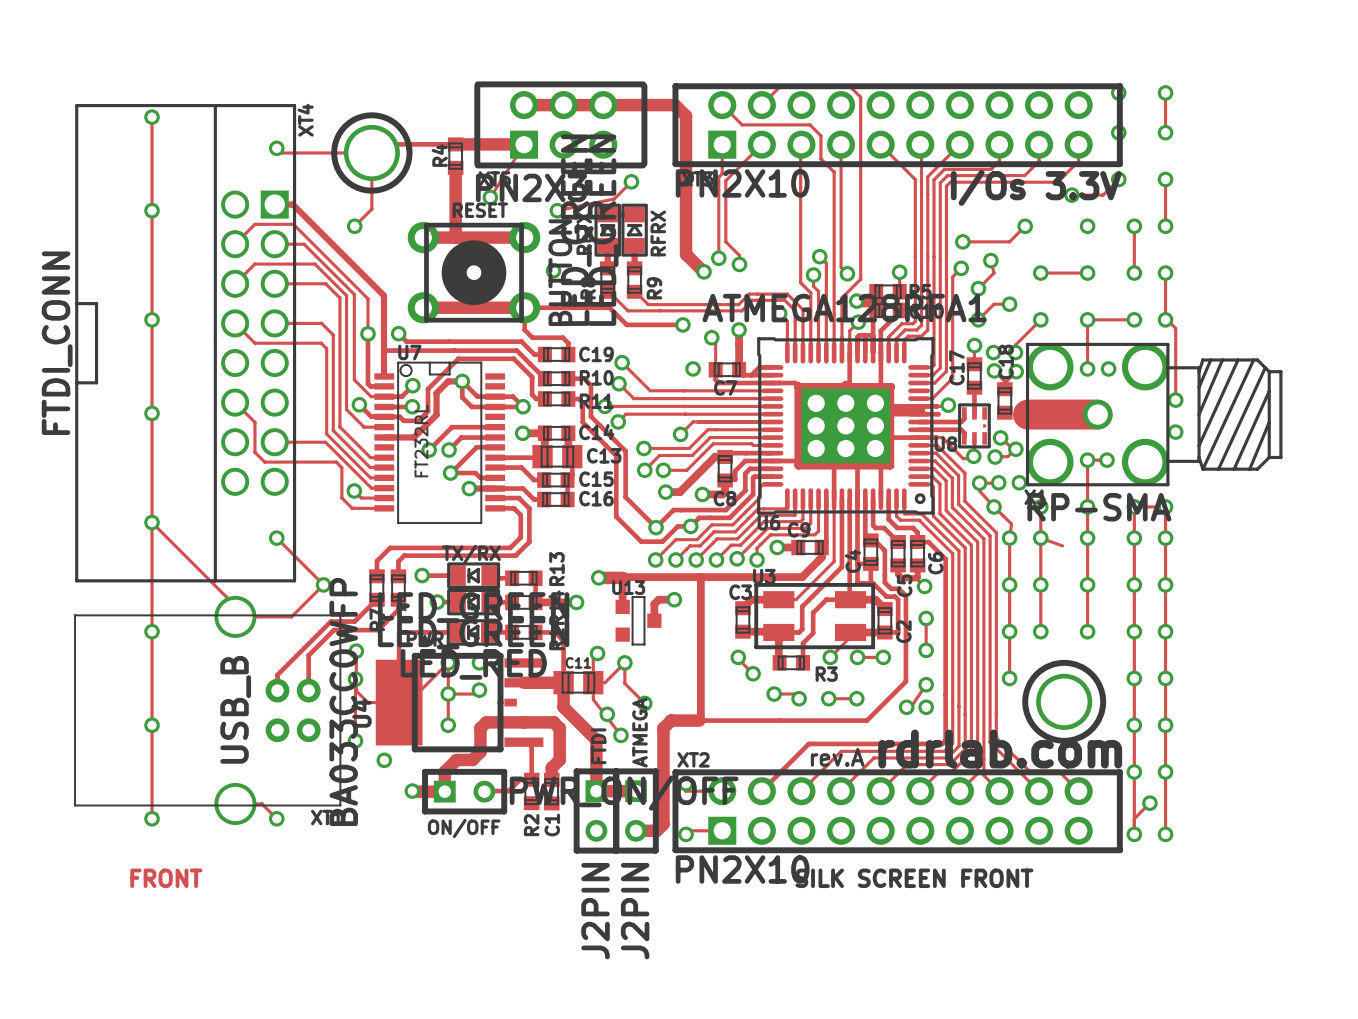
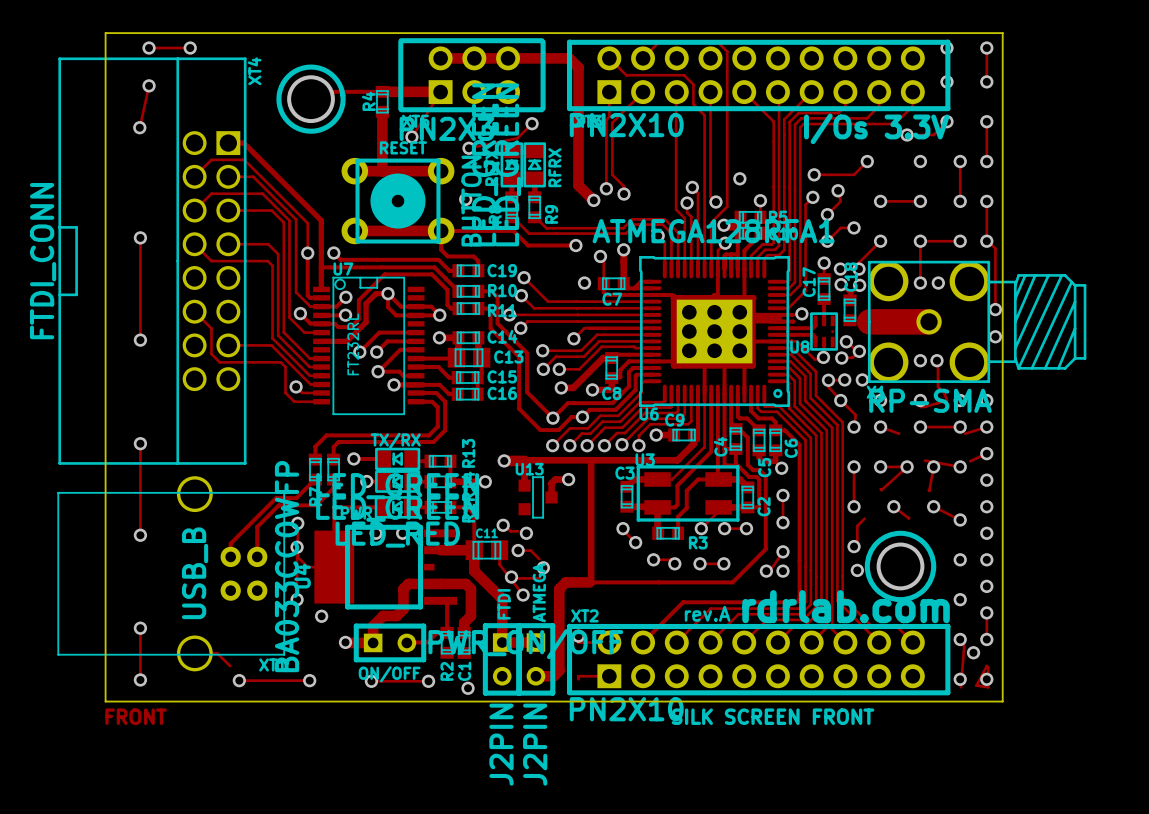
board edge: none -> (105, 33) (1002, 33) (1002, 701) (105, 701) (105, 33)
track: none -> (149, 48) (190, 48)
via: none -> (149, 48)
via: none -> (190, 48)
track: (152, 117) (152, 818) -> none
via: (152, 117) -> none
track: none -> (149, 85) (139, 127)
via: none -> (149, 85)
track: (276, 148) (281, 152) (371, 152) (371, 209) (354, 226) -> none
via: (276, 148) -> none
via position: (152, 210) -> (139, 127)
via: (354, 226) -> none
via: none -> (739, 178)
track: none -> (140, 237) (140, 340)
via position: (152, 319) -> (140, 237)
via position: (152, 413) -> (140, 340)
track: (1107, 460) (1087, 460) (1087, 631) -> none
track: none -> (938, 361) (938, 386) (944, 393) (946, 400) (921, 407)
track: (1040, 506) (1040, 631) -> none
track: (152, 522) (235, 605) (235, 616) (291, 616) (323, 584) (276, 538) -> none
via: (152, 522) -> none
via: (276, 538) -> none
track: (1009, 538) (1009, 584) -> none
track: none -> (920, 427) (960, 427)
track: none -> (986, 427) (965, 433)
track: none -> (140, 443) (140, 535)
via: none -> (140, 443)
track: none -> (986, 453) (970, 461)
via: none -> (986, 453)
track: none -> (925, 460) (960, 466)
via: (323, 584) -> none
track: none -> (880, 466) (907, 466) (880, 489)
via: none -> (907, 466)
via: (1087, 584) -> none
track: none -> (933, 466) (928, 490)
via: none -> (933, 466)
via: (1165, 584) -> none
via: none -> (986, 480)
via: (152, 631) -> none
track: (1009, 631) (1009, 678) -> none
via: (1040, 631) -> none
track: none -> (893, 506) (909, 518)
via: none -> (893, 506)
via: (1087, 631) -> none
track: none -> (933, 506) (960, 519)
via: none -> (933, 506)
via position: (1134, 631) -> (960, 519)
track: none -> (864, 518) (857, 525) (857, 542)
track: none -> (502, 522) (510, 531) (518, 531)
track: (597, 653) (593, 657) (593, 682) (605, 682) (624, 662) (624, 683) (644, 703) -> none
via: none -> (986, 533)
via: none -> (140, 535)
via position: (1134, 678) -> (960, 559)
via: (1165, 678) -> none
track: none -> (518, 550) (530, 550) (539, 559)
via: none -> (518, 550)
track: (479, 690) (475, 694) (448, 694) -> none
via: (479, 690) -> none
via: (448, 694) -> none
via: none -> (986, 559)
track: (399, 702) (408, 702) (448, 662) (448, 725) -> none
via: none -> (857, 570)
track: none -> (512, 578) (540, 578)
via: (152, 725) -> none
via: (448, 725) -> none
via: (1134, 725) -> none
via: none -> (960, 599)
track: (1165, 756) (1165, 506) (1134, 506) (1134, 834) -> none
via: none -> (986, 612)
via: (1134, 772) -> none
via: (1165, 772) -> none
track: none -> (140, 628) (140, 679)
via: none -> (140, 628)
track: none -> (960, 639) (964, 646) (960, 687)
via: none -> (960, 639)
track: (1165, 787) (1165, 834) -> none
via: none -> (986, 639)
track: (1149, 803) (1134, 818) -> none
via: (152, 818) -> none
via position: (276, 818) -> (239, 680)
track: none -> (986, 666) (976, 685) (988, 687) (986, 666)
via: (686, 834) -> none
via: none -> (140, 679)
track: none -> (239, 680) (309, 680)
via: none -> (309, 680)
track: none -> (371, 681) (428, 681)
via: none -> (371, 681)
via: none -> (428, 681)
via: none -> (468, 688)

